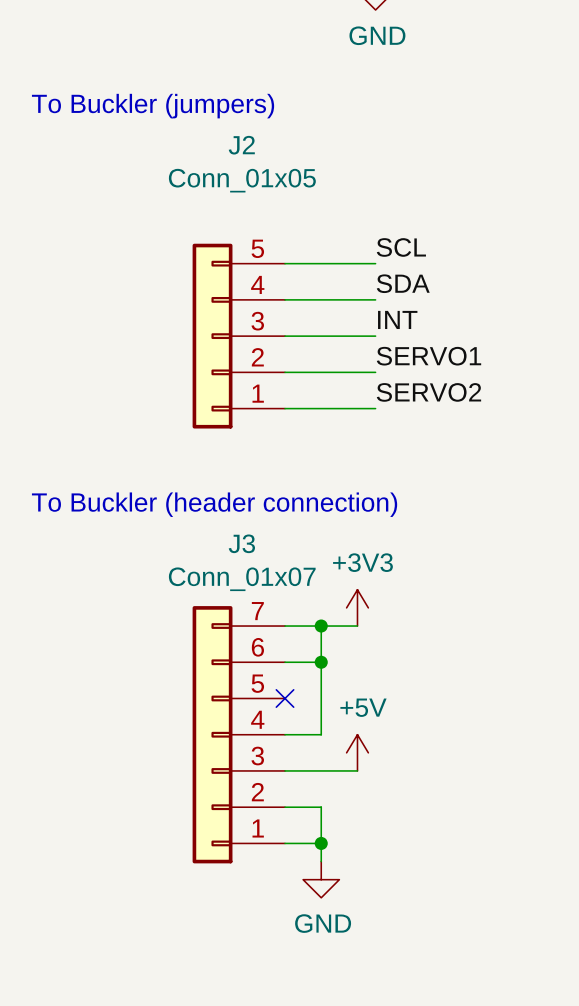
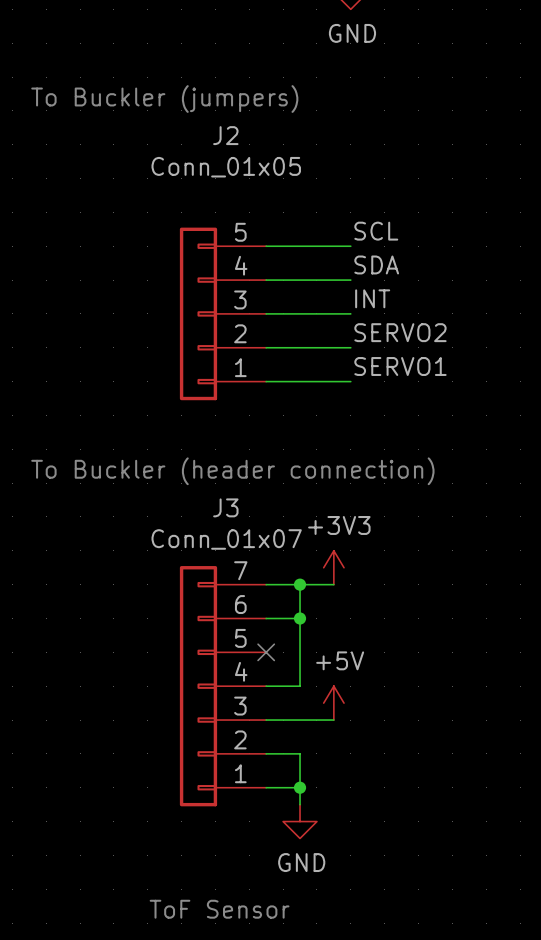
label: SERVO1 (428, 356) -> SERVO2 (400, 332)
label: SERVO2 (428, 392) -> SERVO1 (400, 366)
text: none -> ToF Sensor (219, 909)

